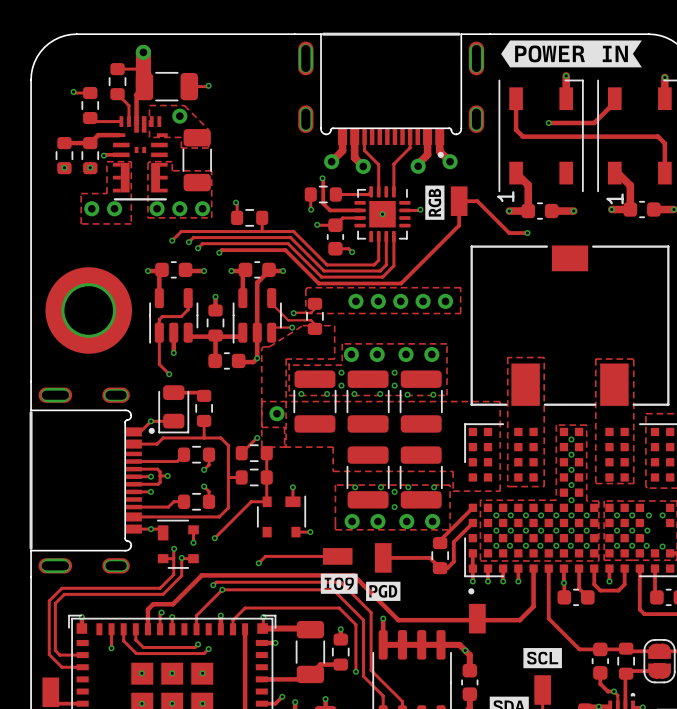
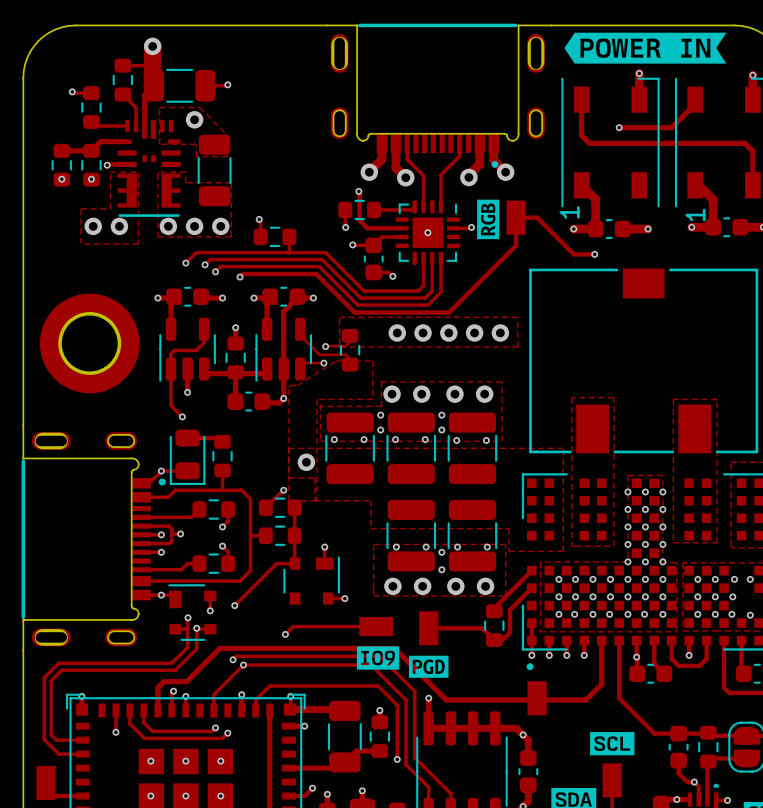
via: none -> (627, 492)
via: none -> (662, 492)
via: none -> (627, 509)
via: none -> (662, 509)
via: none -> (627, 526)
via: none -> (662, 526)
via: none -> (627, 544)
via: none -> (662, 544)
via: none -> (627, 561)
via: none -> (662, 561)

